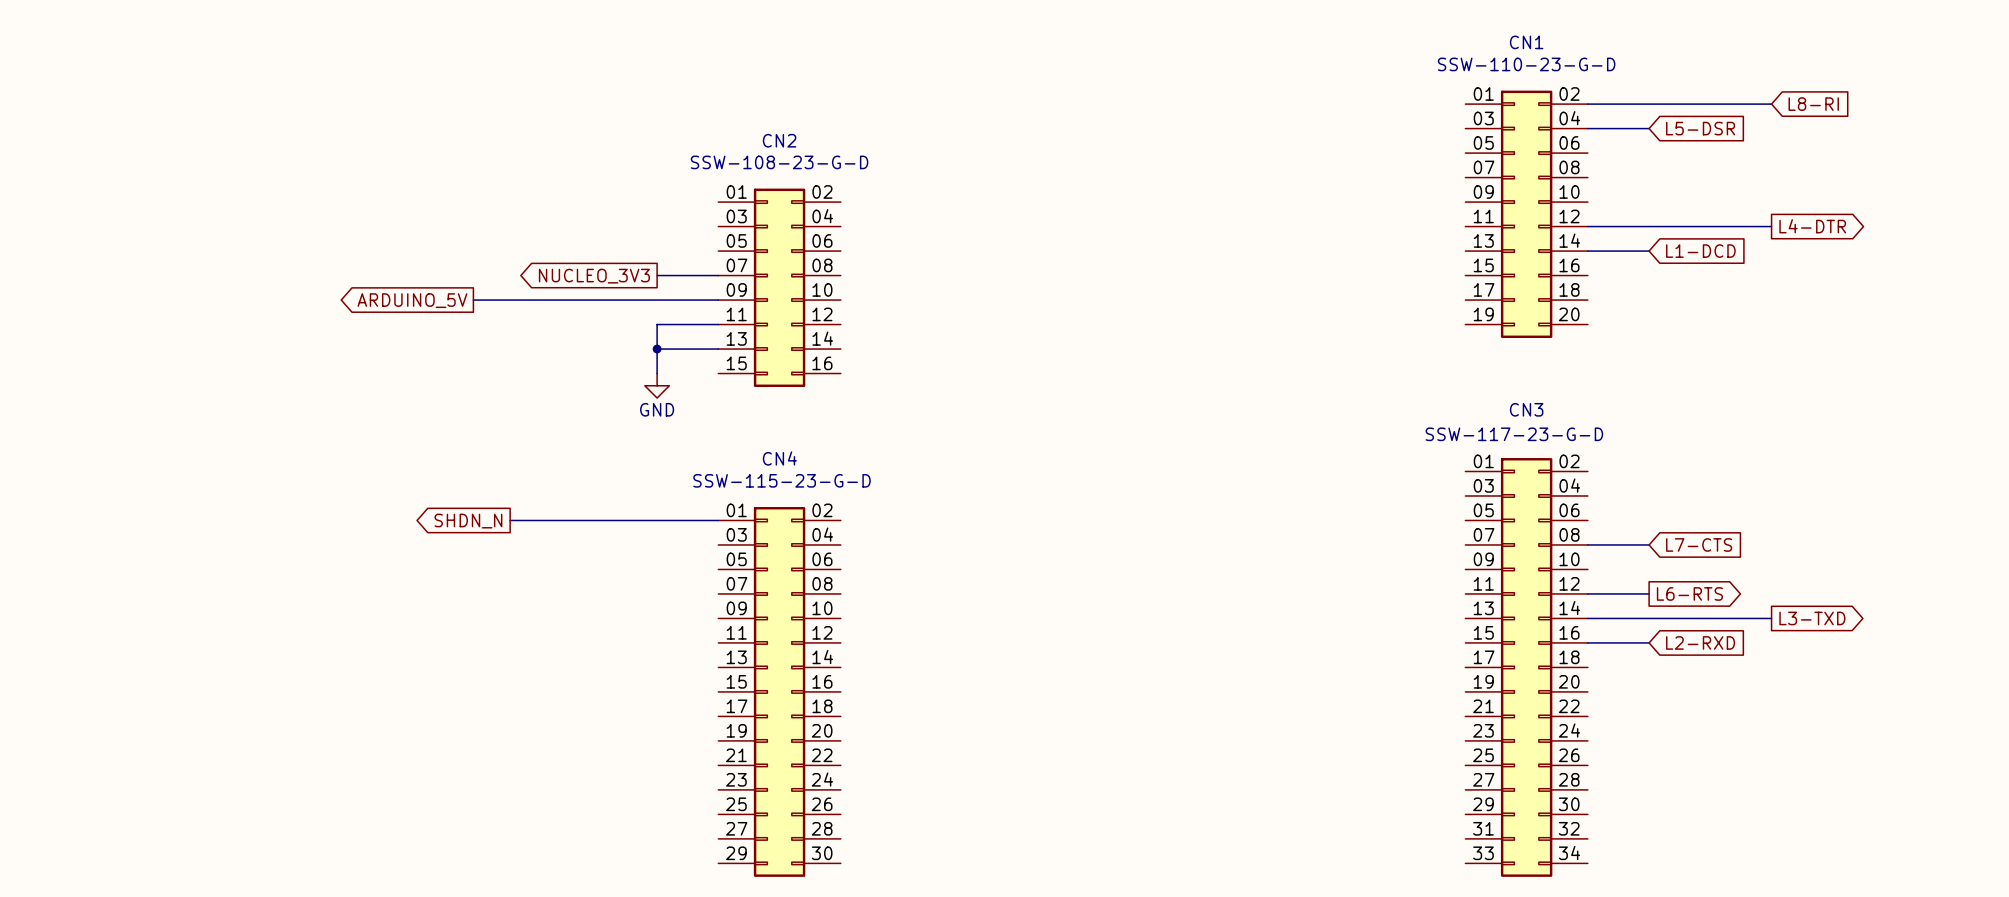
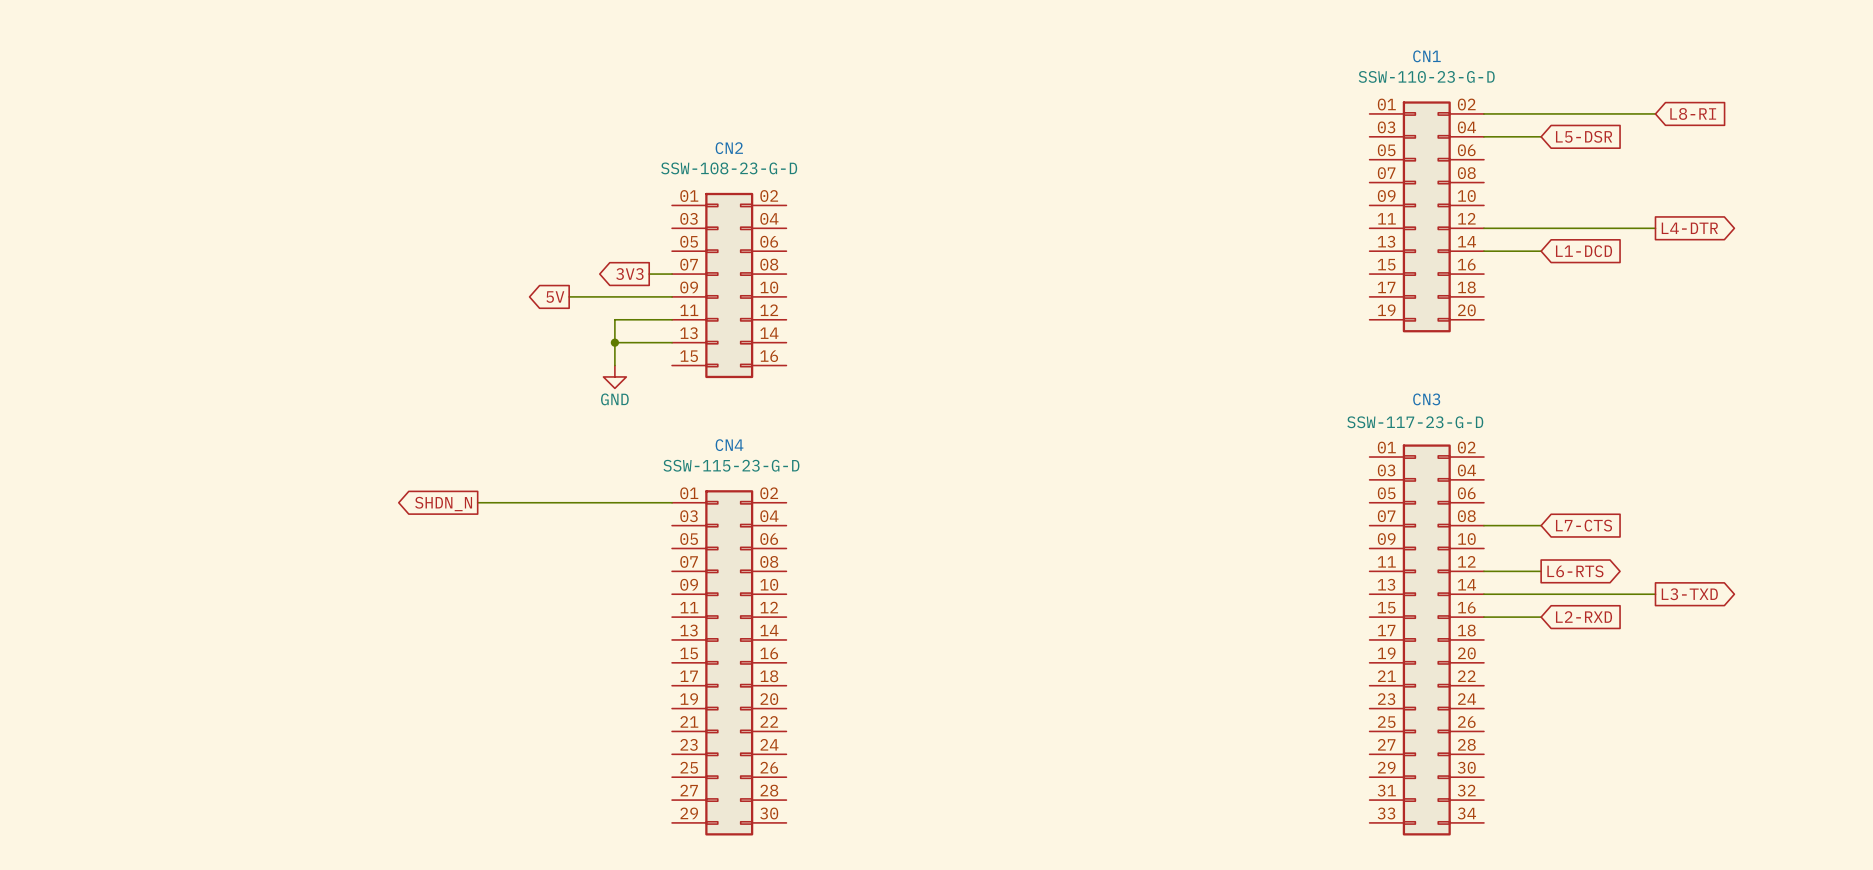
wire: (657, 275) (693, 275) -> none
global label: none -> 3V3 (629, 274)
global label: NUCLEO_3V3 (594, 276) -> none
global label: ARDUINO_5V (412, 300) -> none
wire: (473, 300) (608, 300) -> none
global label: none -> 5V (555, 297)

